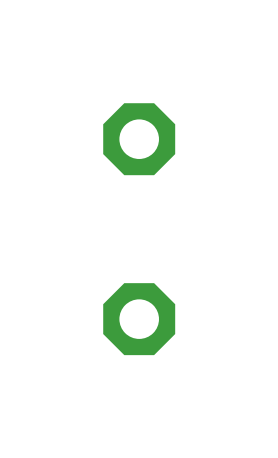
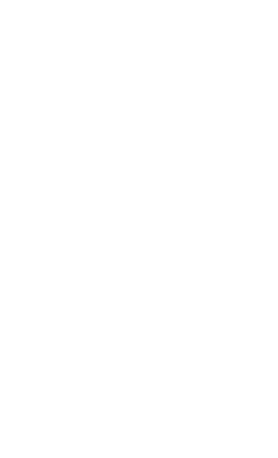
part: (139, 139) -> none
part: (139, 319) -> none

